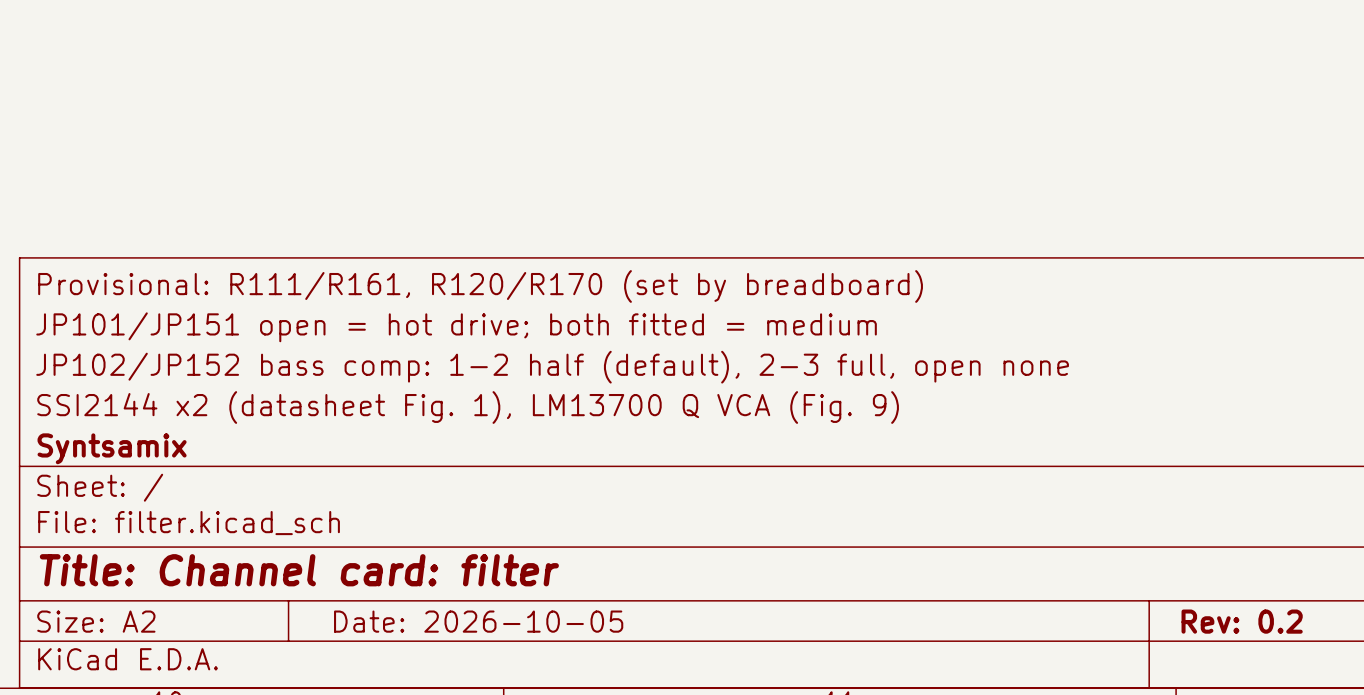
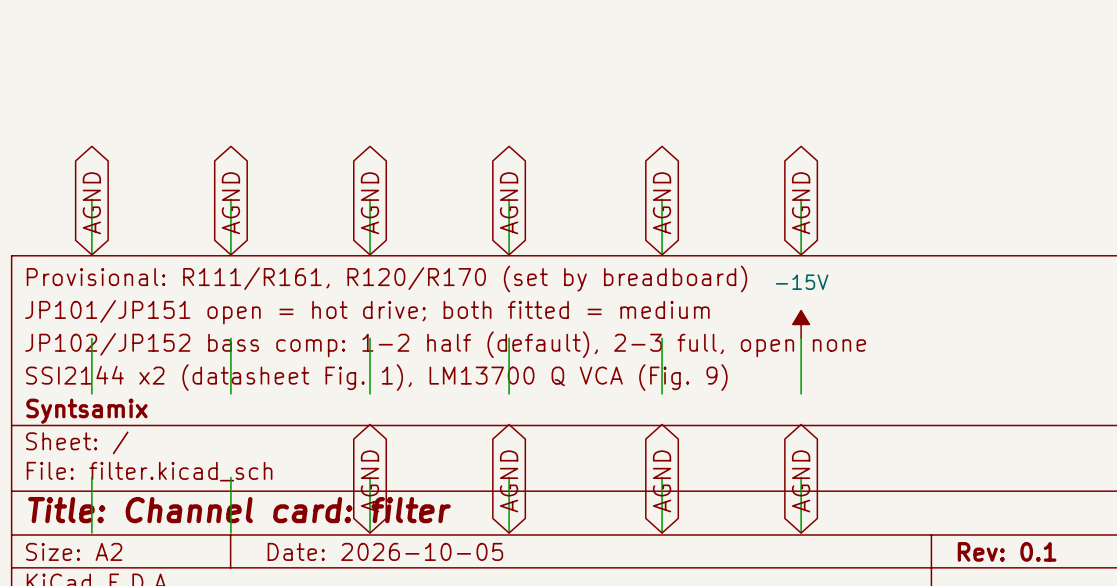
wire: none -> (91, 199) (91, 254)
wire: none -> (230, 199) (230, 254)
wire: none -> (370, 199) (370, 254)
wire: none -> (509, 199) (509, 254)
wire: none -> (662, 199) (662, 254)
wire: none -> (801, 199) (801, 254)
global label: none -> AGND (91, 203)
global label: none -> AGND (230, 203)
global label: none -> AGND (370, 203)
global label: none -> AGND (509, 203)
global label: none -> AGND (662, 203)
global label: none -> AGND (801, 203)
power symbol: none -> -15V (801, 324)
wire: none -> (91, 338) (91, 393)
wire: none -> (230, 338) (230, 393)
wire: none -> (370, 338) (370, 393)
wire: none -> (509, 338) (509, 393)
wire: none -> (662, 338) (662, 393)
wire: none -> (801, 338) (801, 393)
wire: none -> (91, 477) (91, 533)
wire: none -> (230, 477) (230, 533)
wire: none -> (370, 477) (370, 533)
wire: none -> (509, 477) (509, 533)
wire: none -> (662, 477) (662, 533)
wire: none -> (801, 477) (801, 533)
global label: none -> AGND (370, 481)
global label: none -> AGND (509, 481)
global label: none -> AGND (662, 481)
global label: none -> AGND (801, 481)
title block: Rev: 0.2 (1242, 621) -> Rev: 0.1 (1007, 551)

